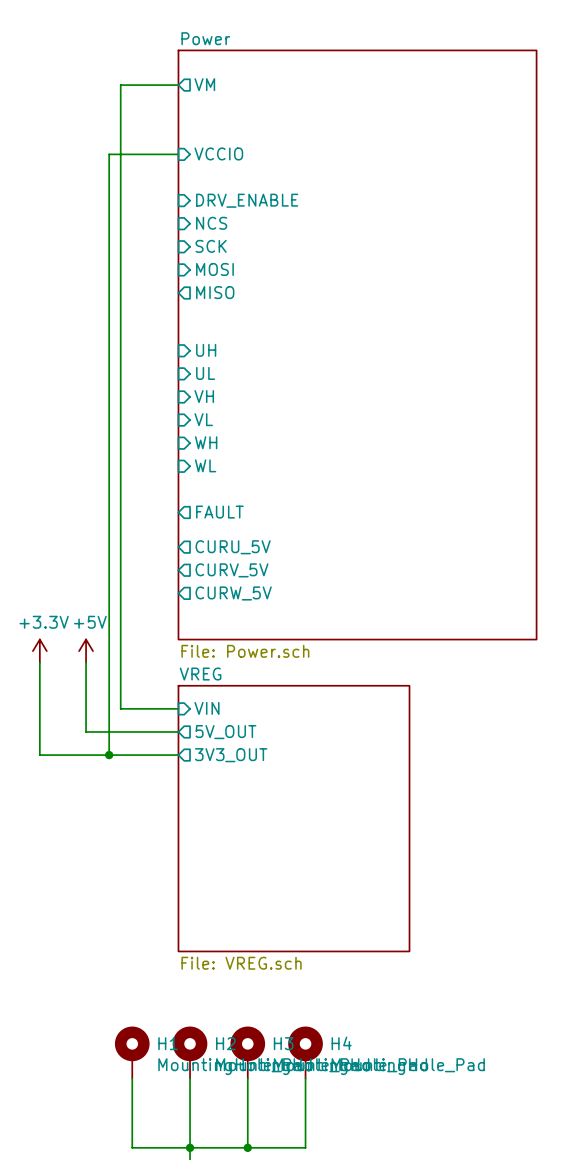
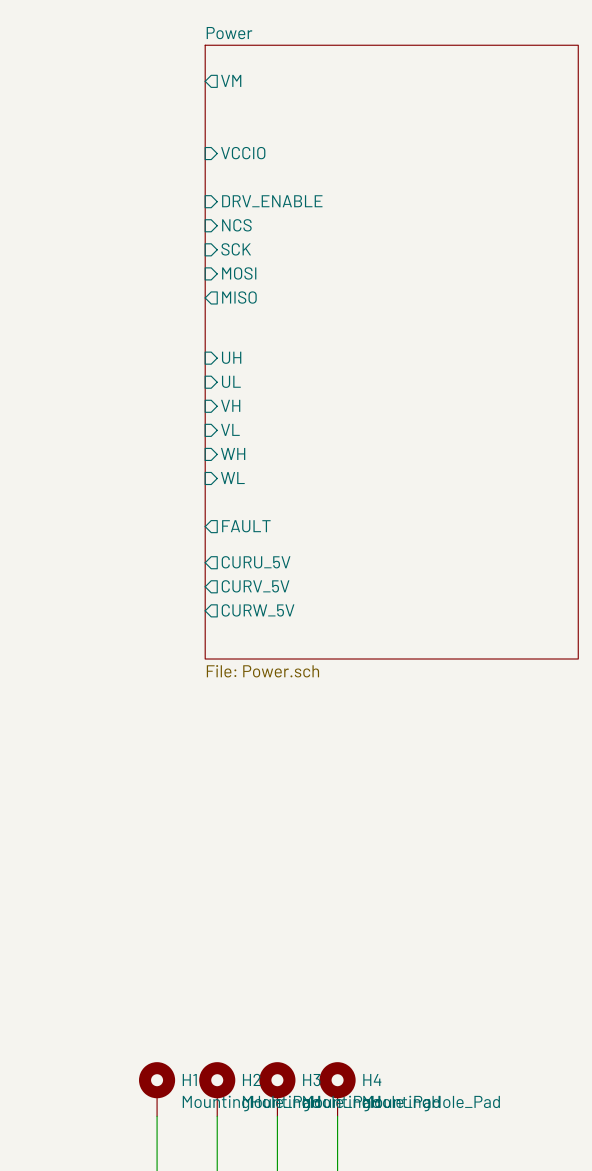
wire: (178, 85) (120, 85) (120, 708) (178, 708) -> none
wire: (178, 154) (109, 154) (109, 755) -> none
power symbol: +3.3V (39, 651) -> none
power symbol: +5V (86, 651) -> none
wire: (39, 662) (39, 755) (178, 755) -> none
wire: (86, 662) (86, 731) (178, 731) -> none
sheet pin: VIN (206, 708) -> none
sheet pin: 5V_OUT (225, 732) -> none
junction: (109, 755) -> none
sheet pin: 3V3_OUT (231, 755) -> none
sheet VREG: File: VREG.sch (293, 818) -> none

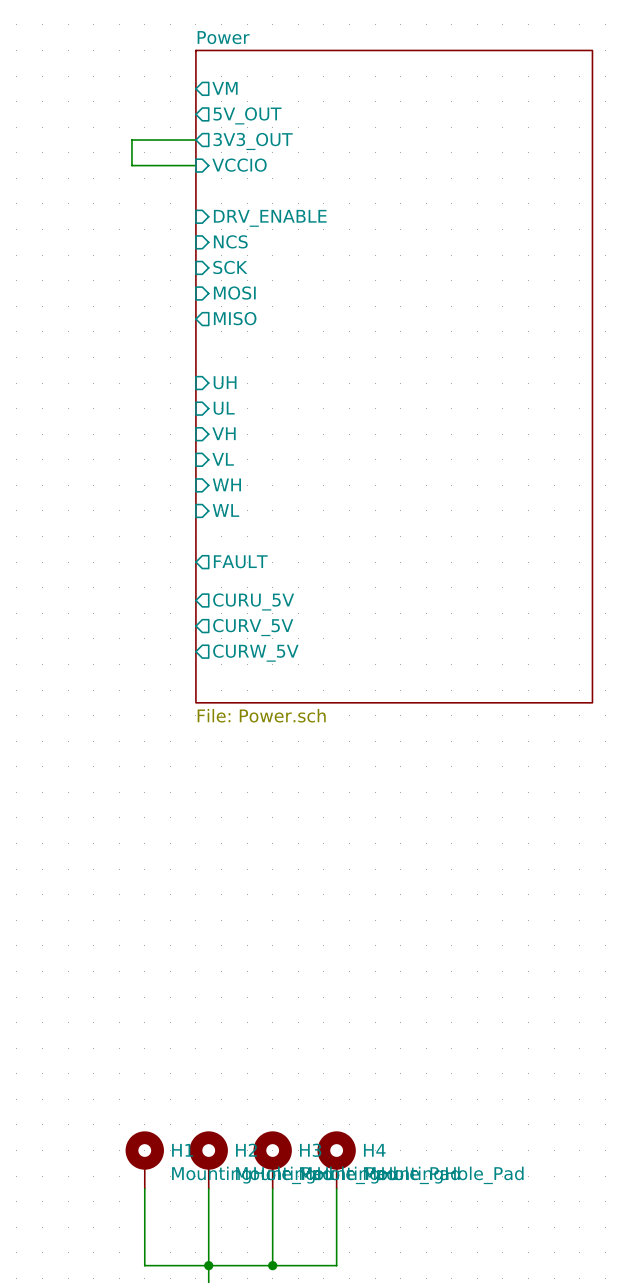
sheet pin: none -> 5V_OUT (247, 115)
wire: none -> (195, 140) (131, 140) (131, 165) (195, 165)
sheet pin: none -> 3V3_OUT (253, 141)

